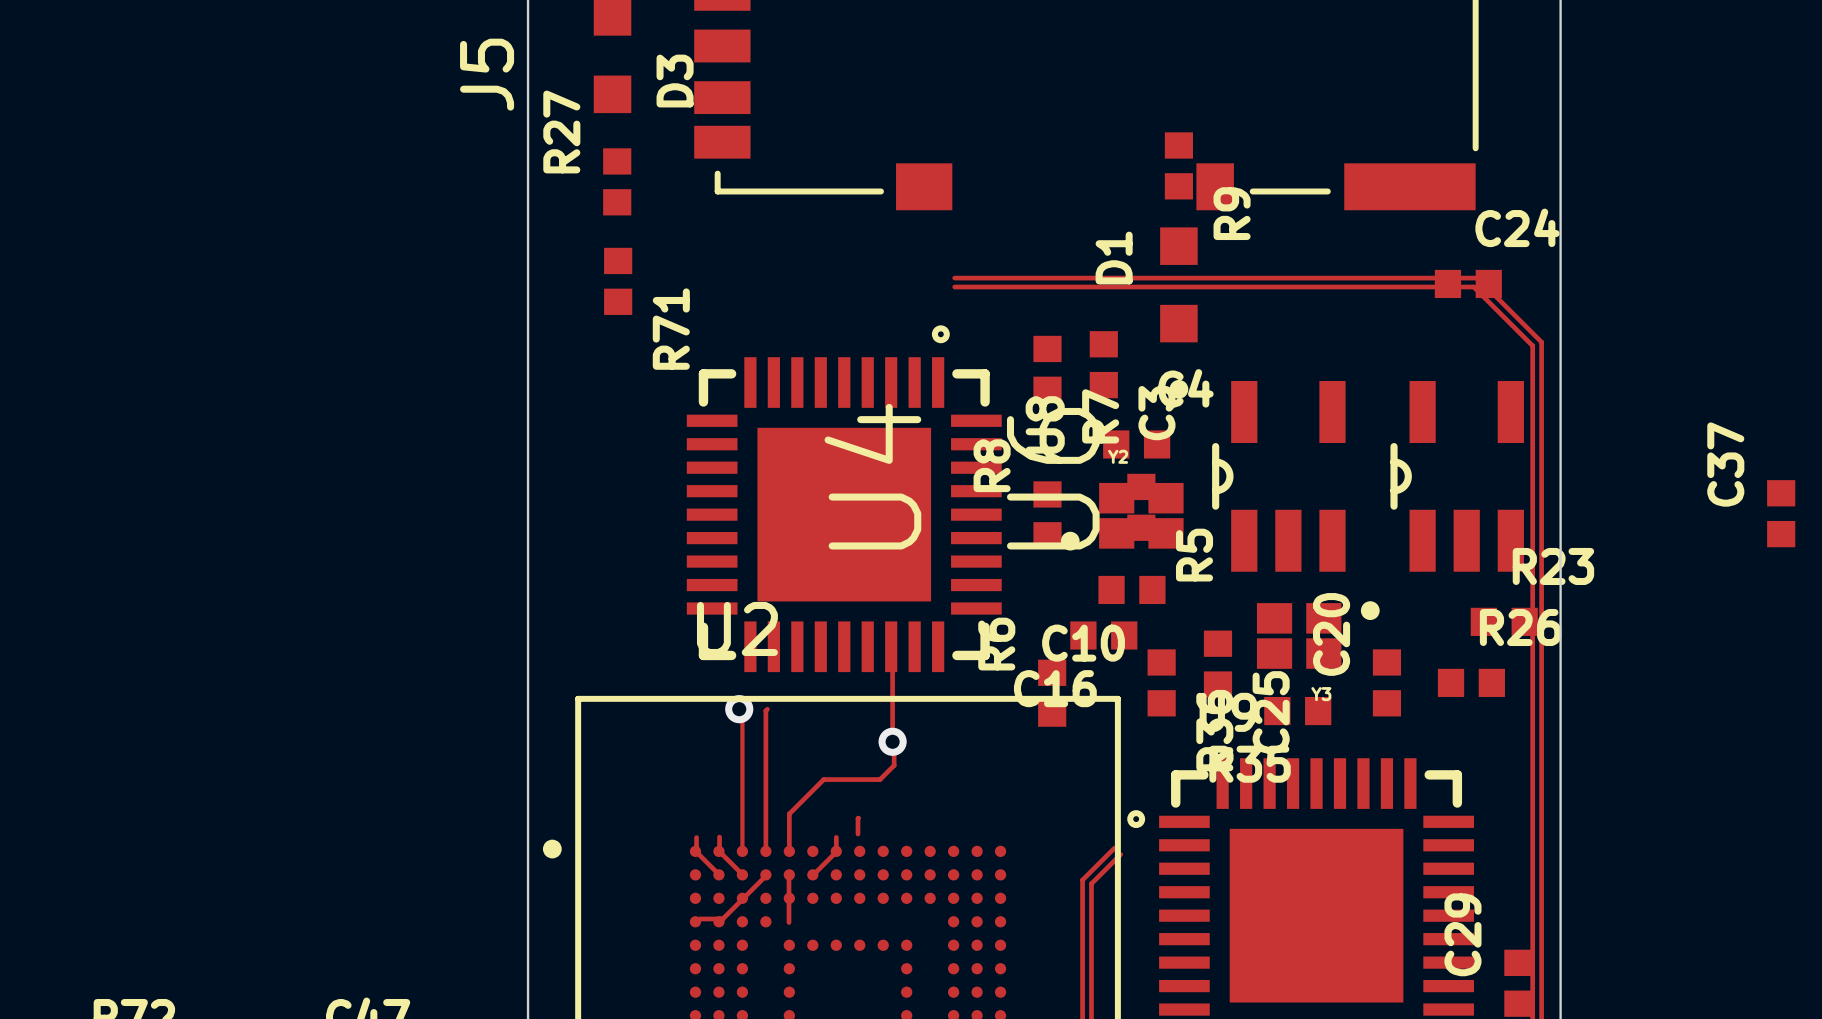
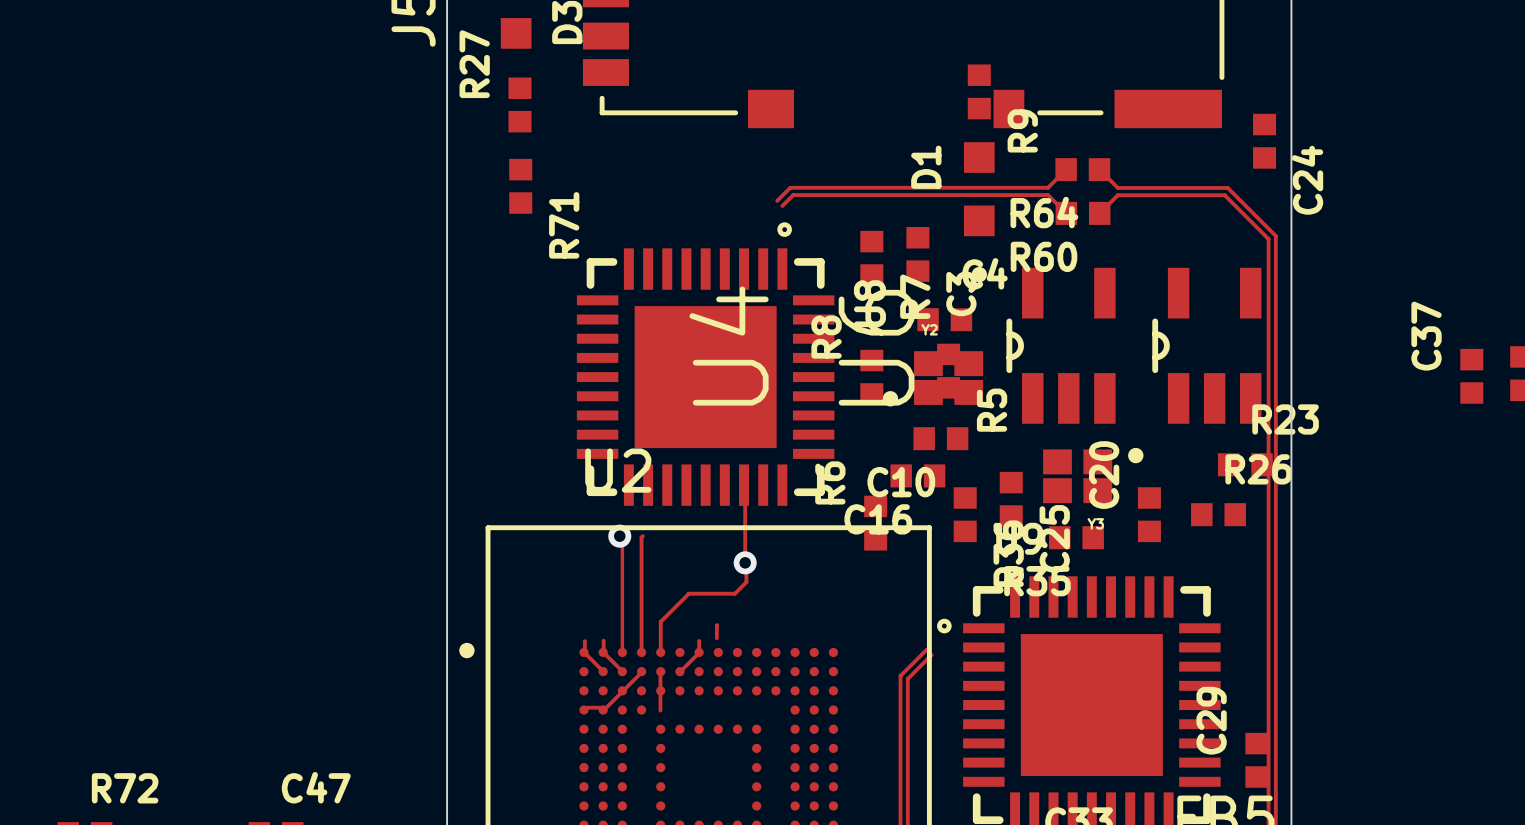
track: none -> (1066, 169) (1048, 187) (790, 187) (777, 200)
R64: none -> (1082, 169)
track: (954, 278) (1477, 278) (1482, 283) -> (1099, 169) (1117, 187) (1227, 187)
C24 rotation: 0° (1468, 283) -> 90° clockwise (1264, 141)
C24 position: (1468, 283) -> (1264, 141)
track: (954, 287) (1473, 287) (1479, 292) -> (1099, 213) (1117, 195) (1224, 195)
track: none -> (782, 205) (793, 195) (1048, 195) (1066, 213)
R60: none -> (1083, 213)

